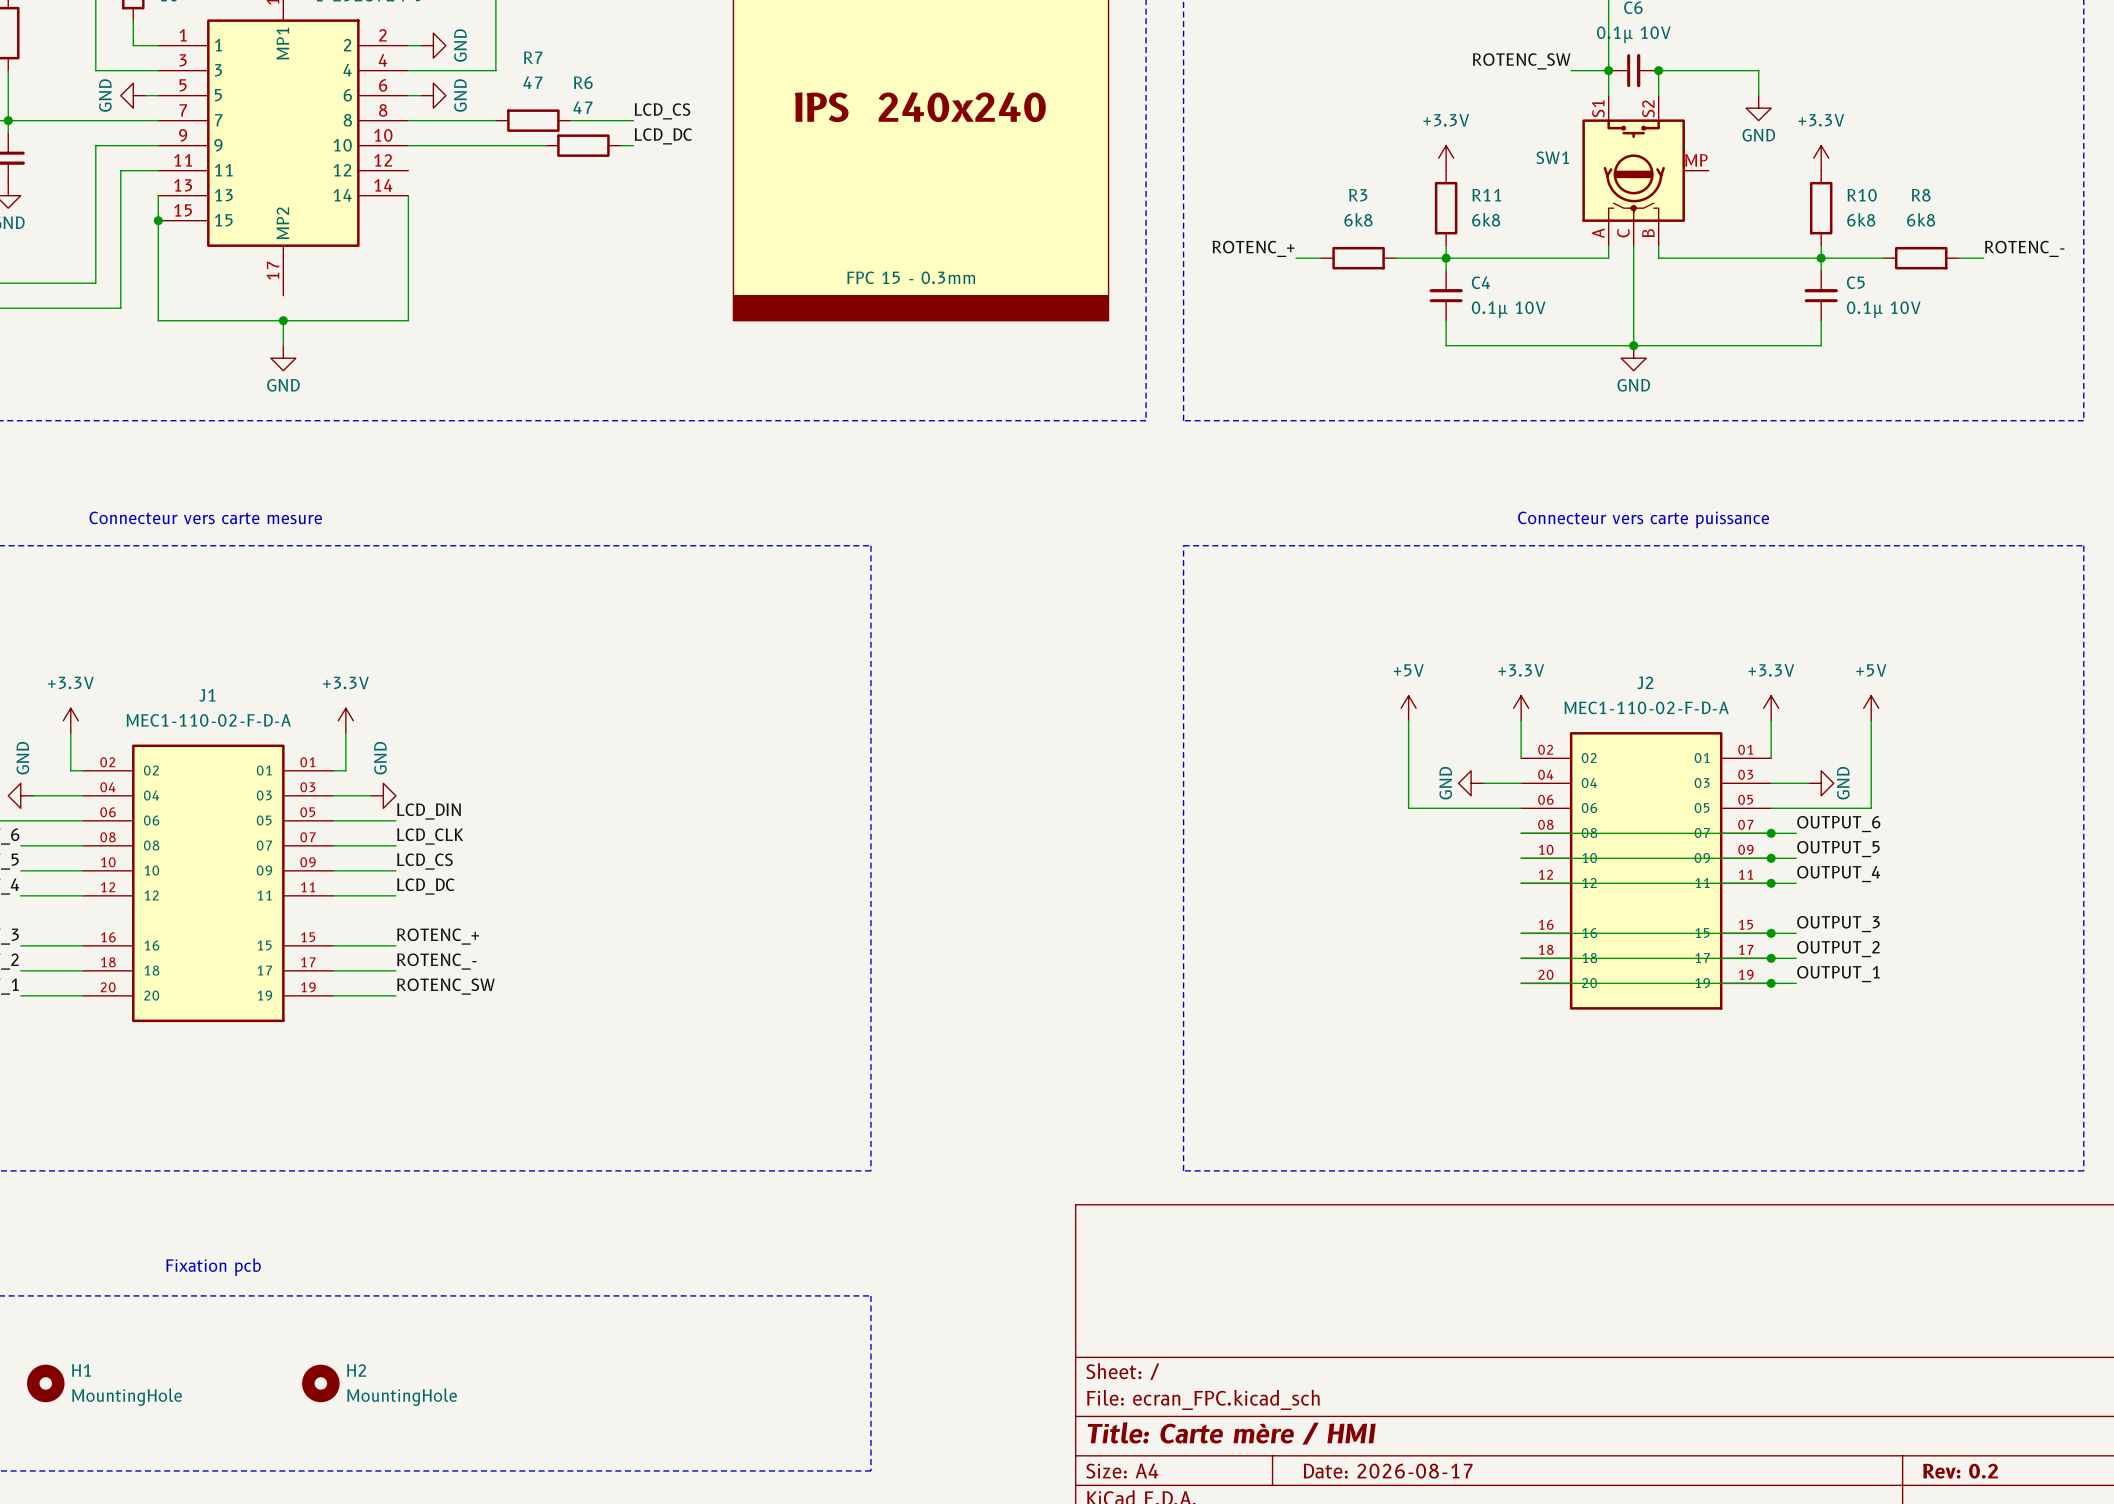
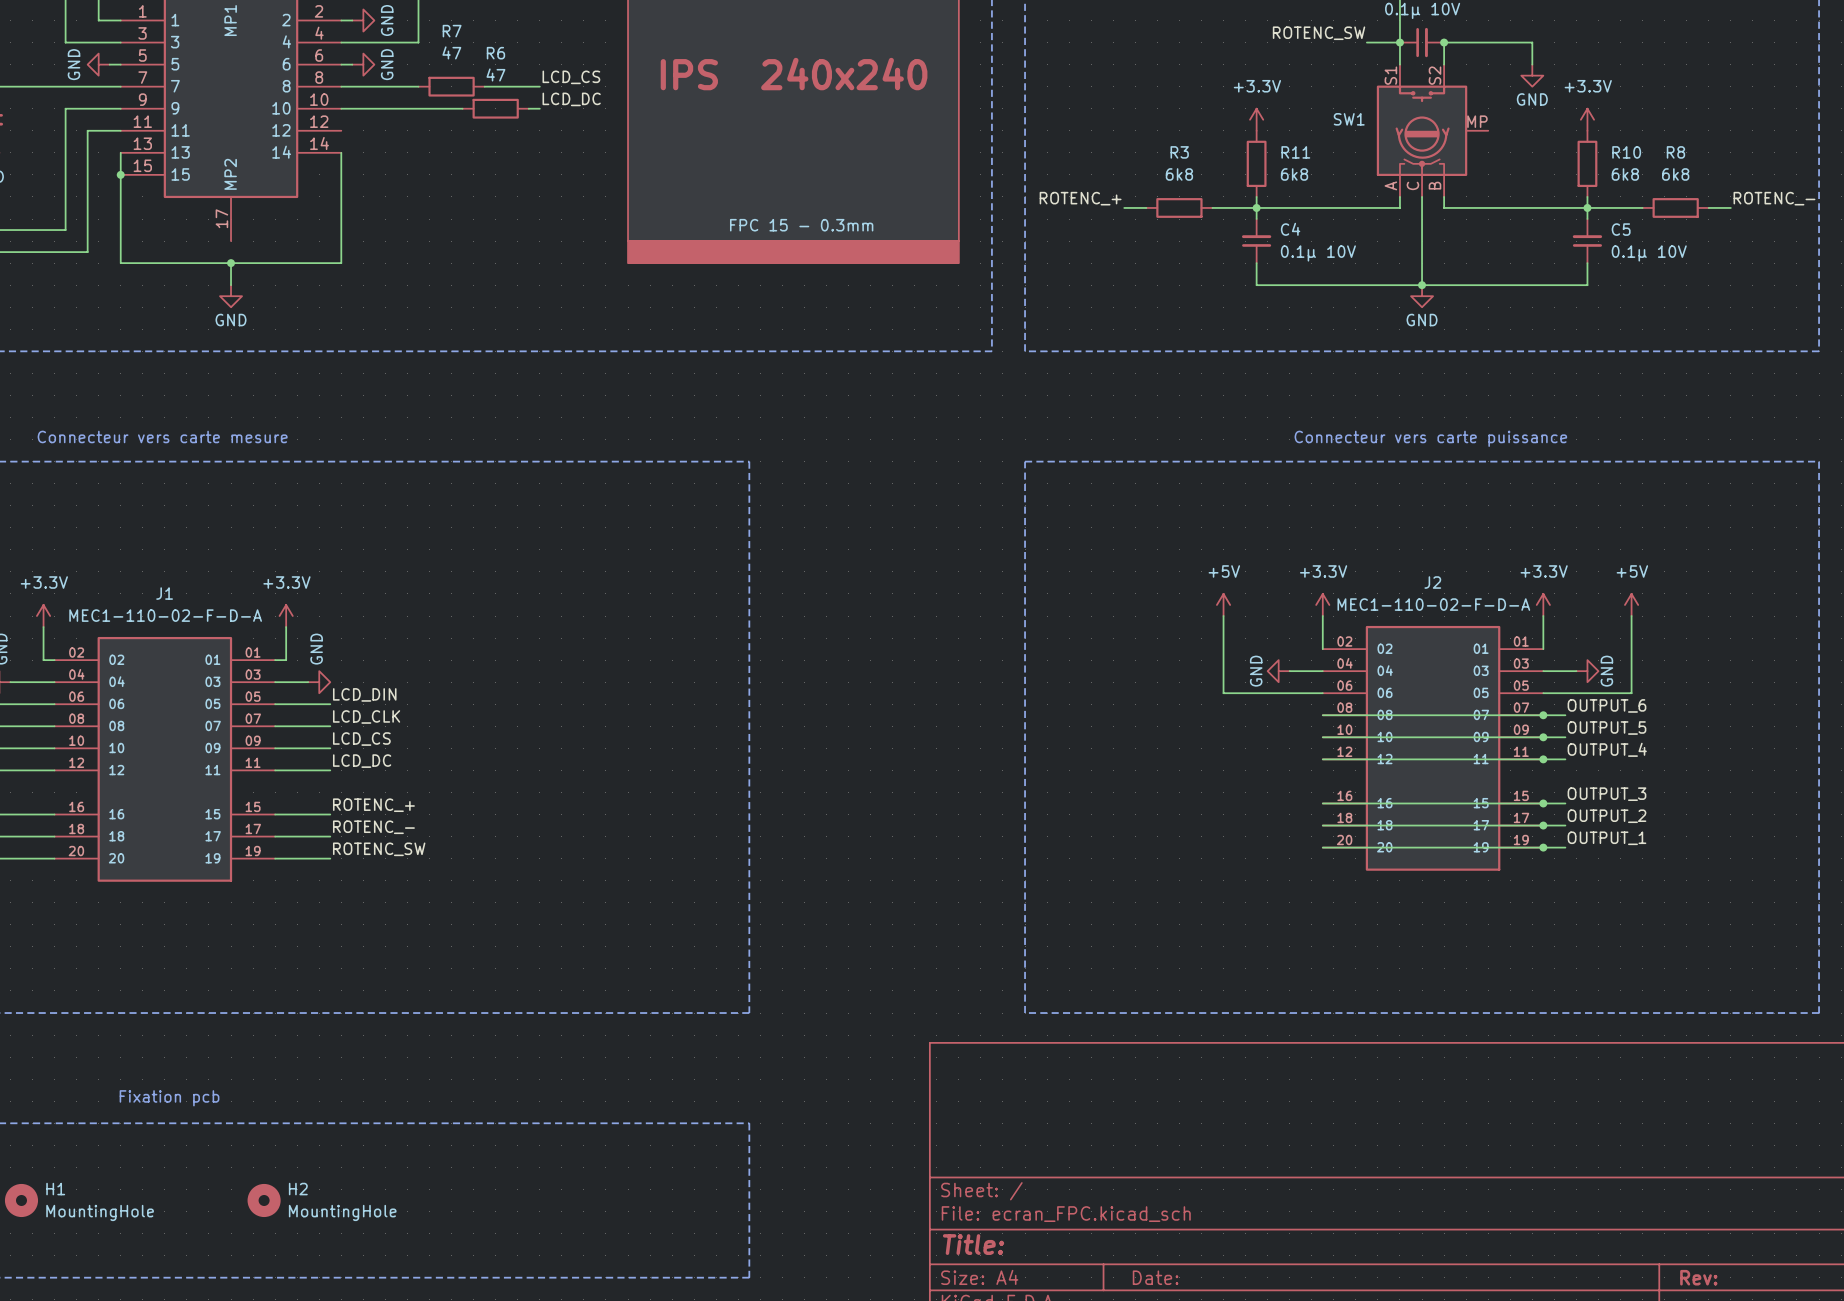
title block: Title: Carte mère / HMI (1231, 1433) -> Title: (973, 1244)
title block: Date: 2026-08-17 (1388, 1471) -> Date: (1155, 1277)
title block: Rev: 0.2 (1960, 1471) -> Rev: (1698, 1277)

